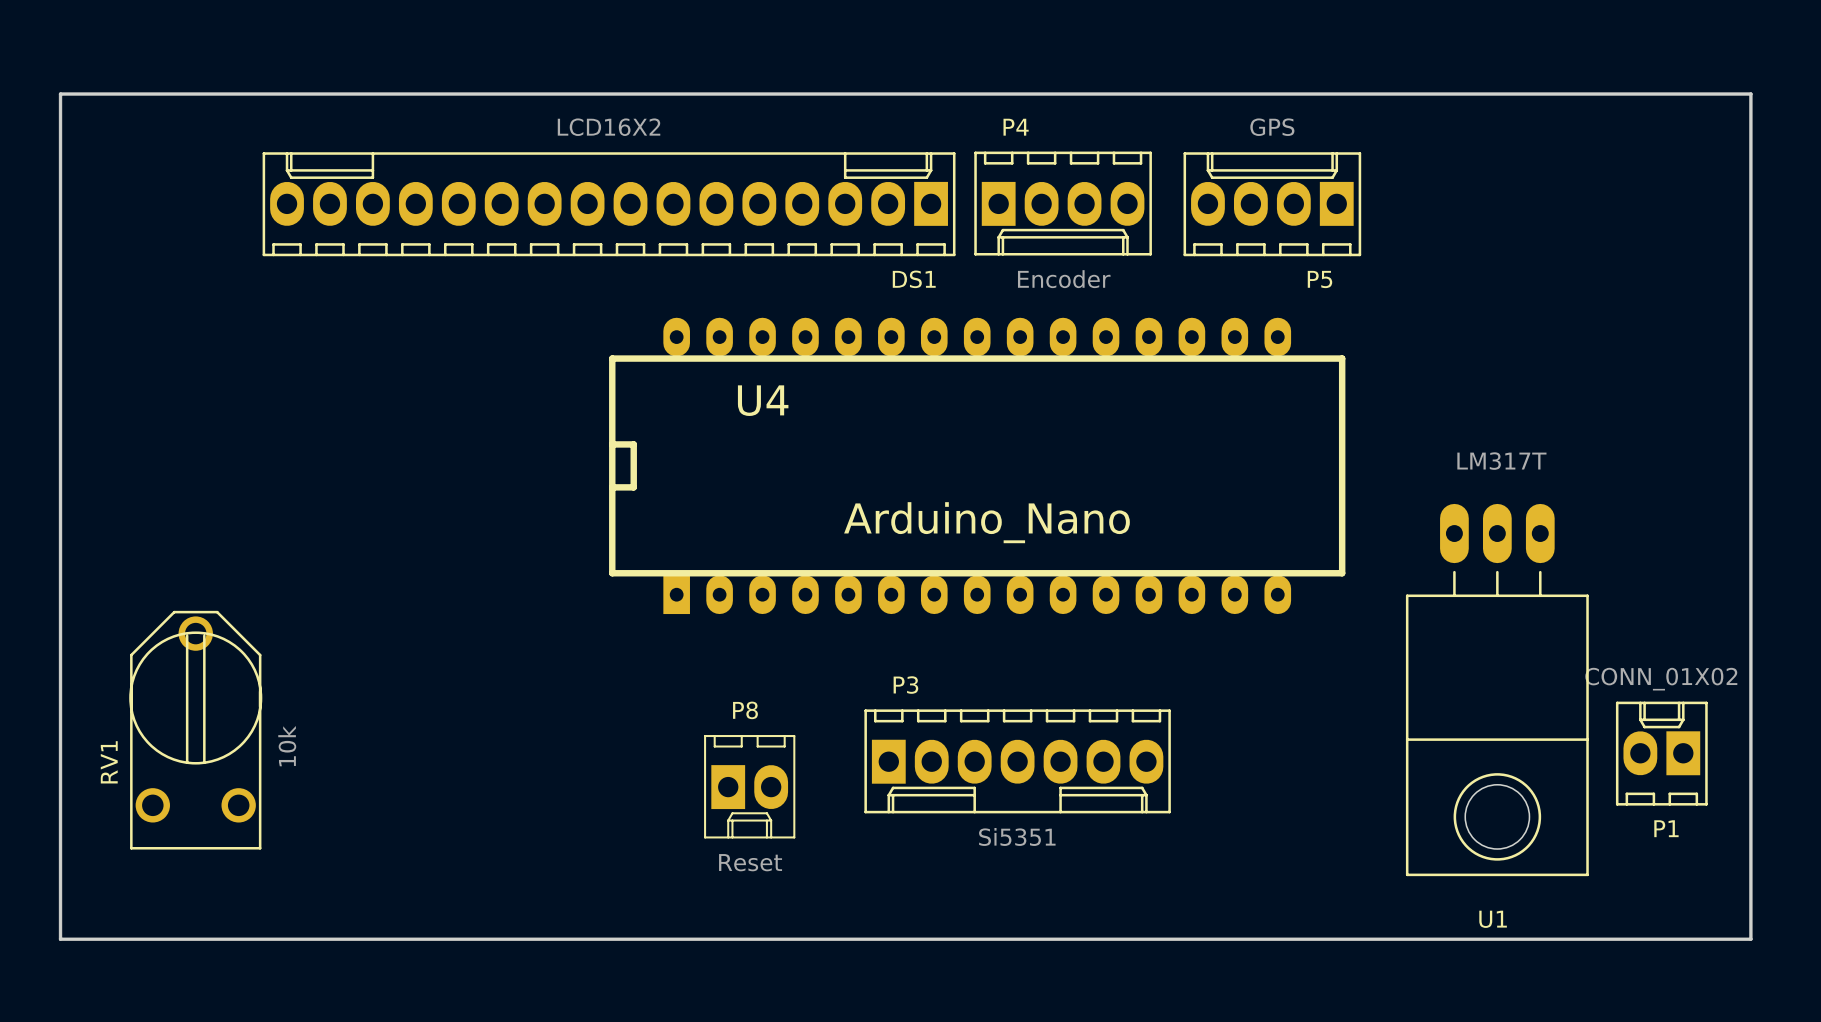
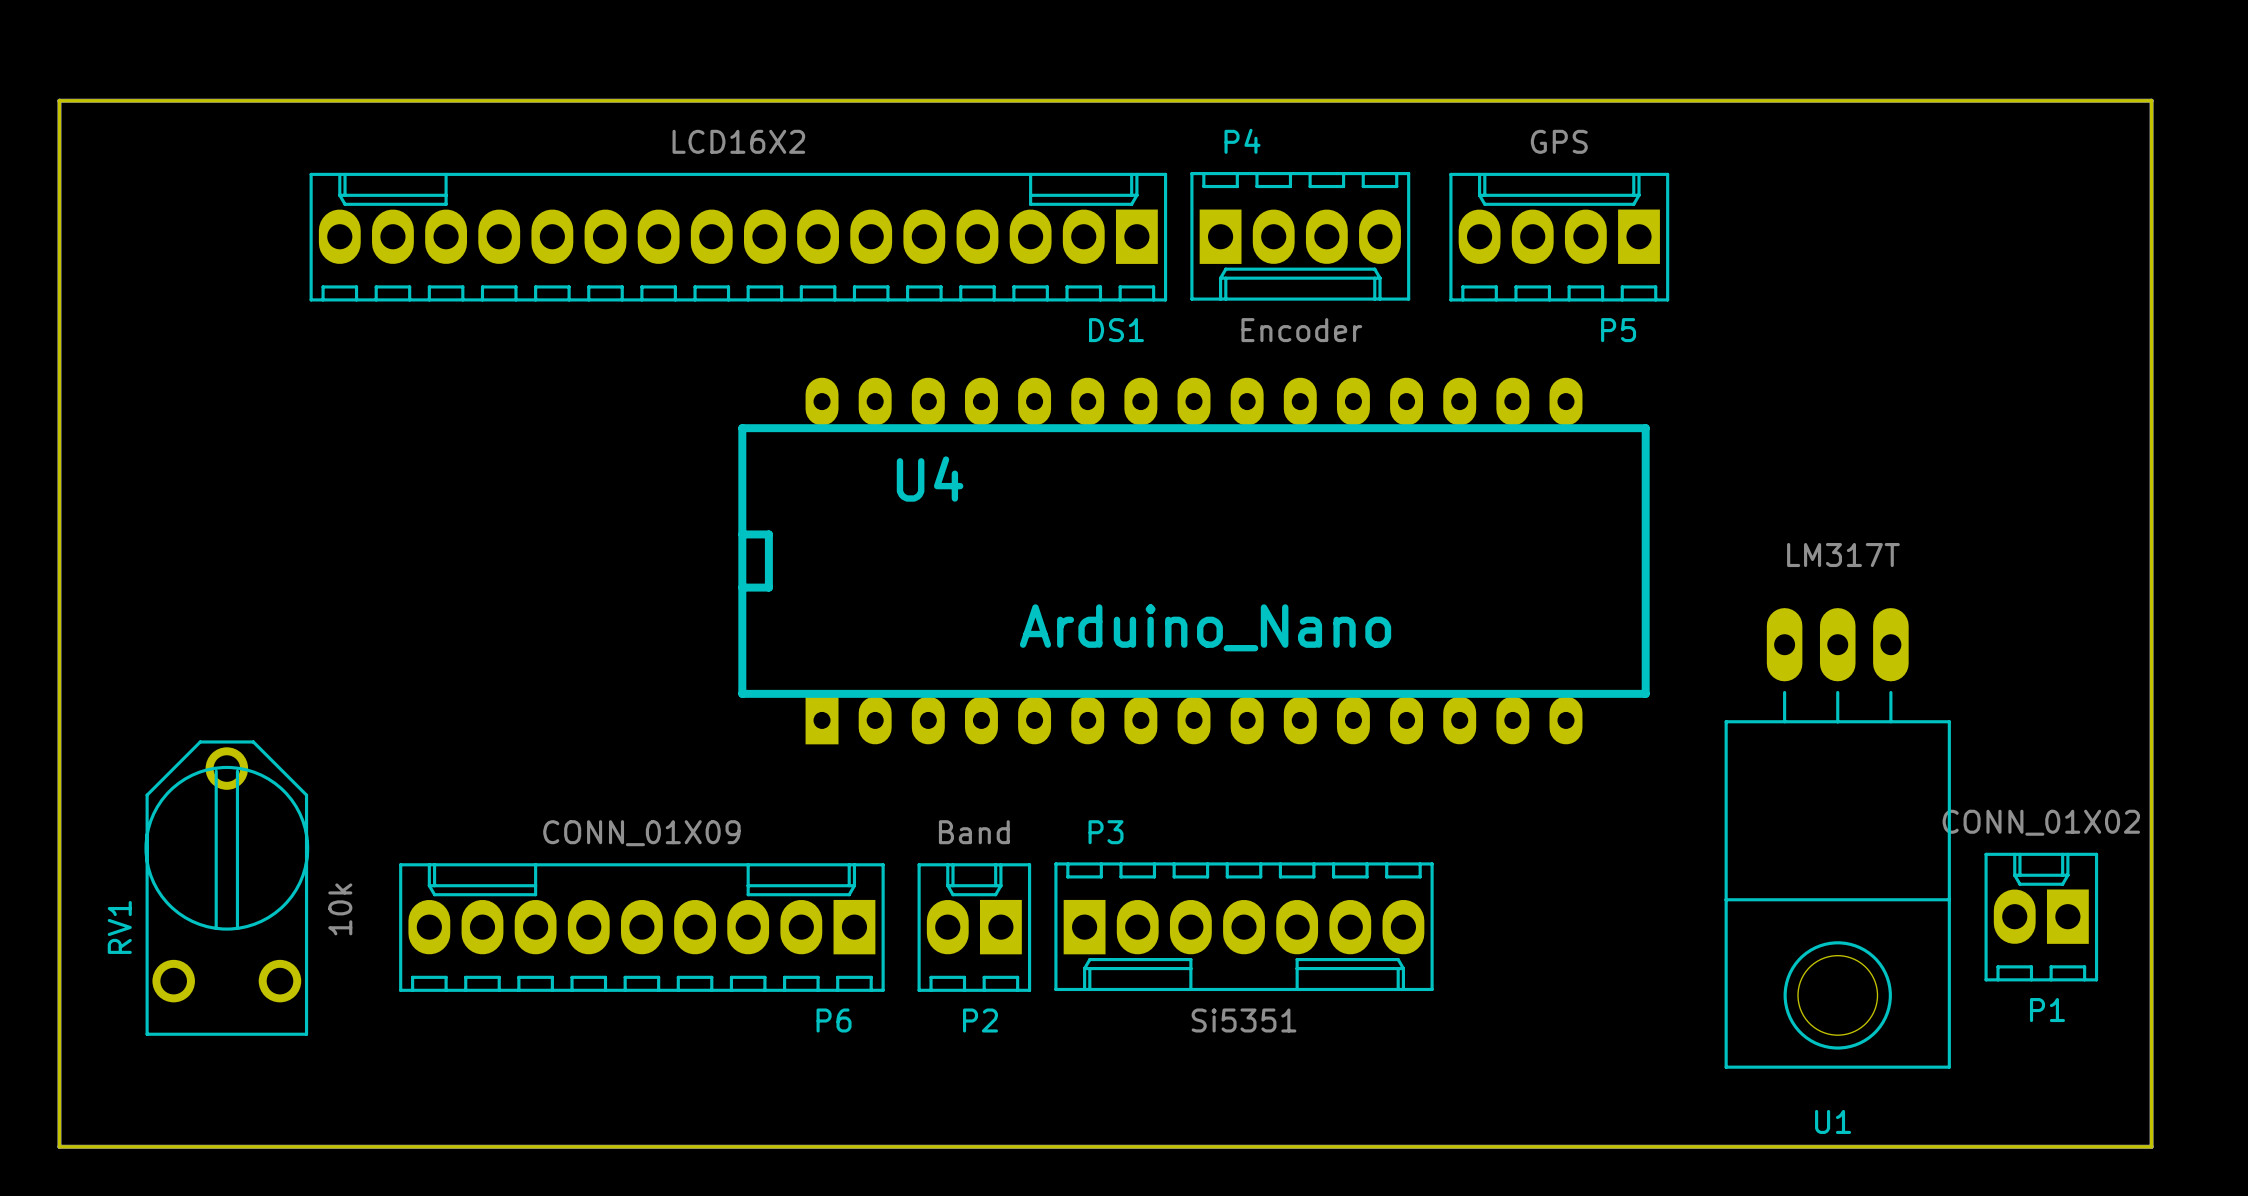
P6: none -> CONN_01X09 (641, 927)
P2: none -> Band (974, 927)
P8: Reset (749, 786) -> none

